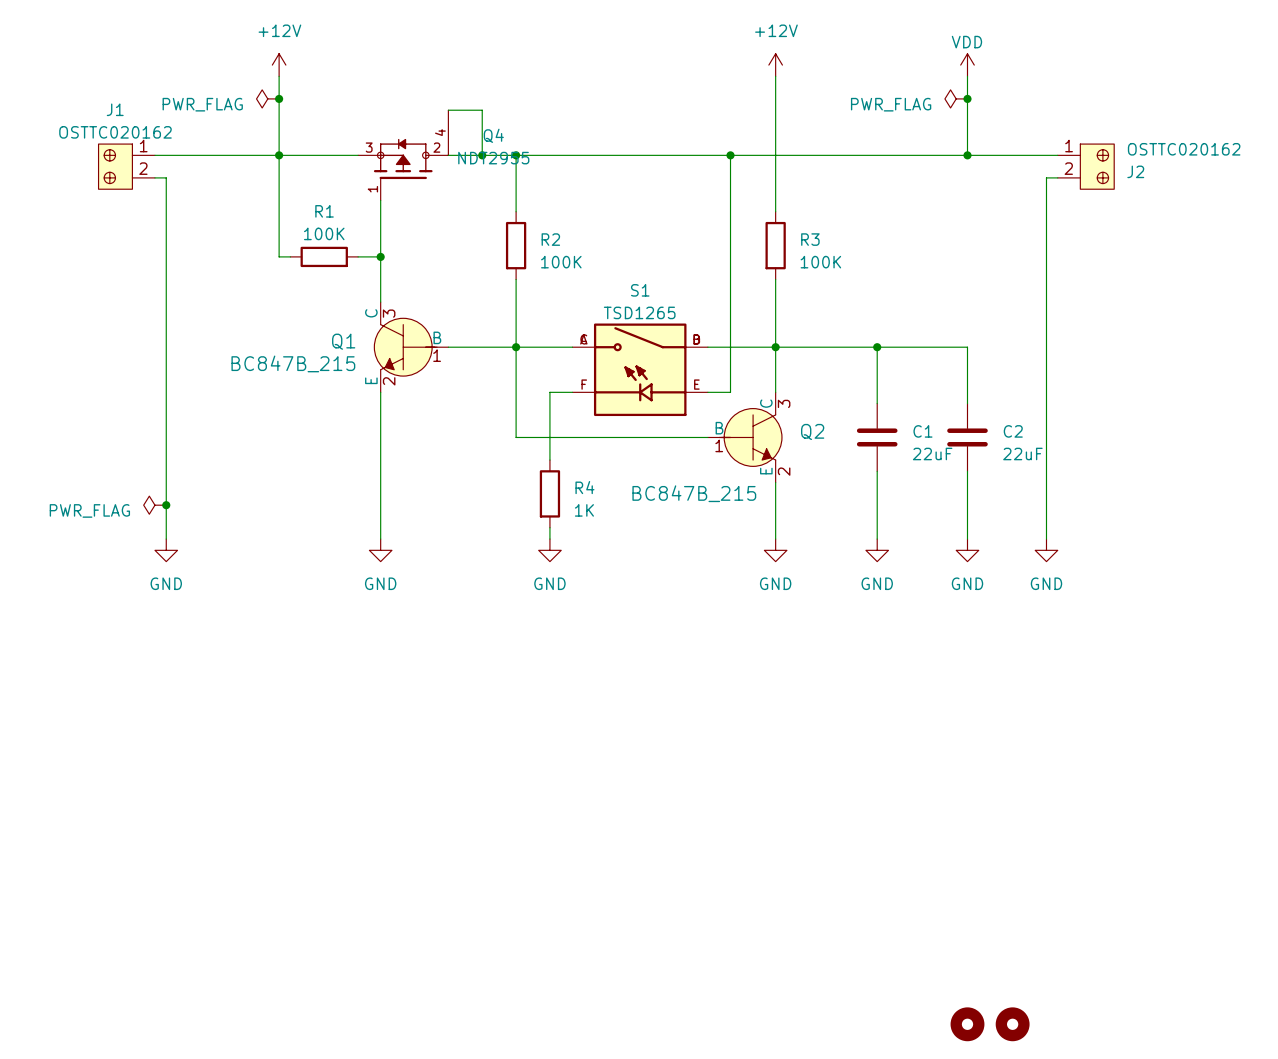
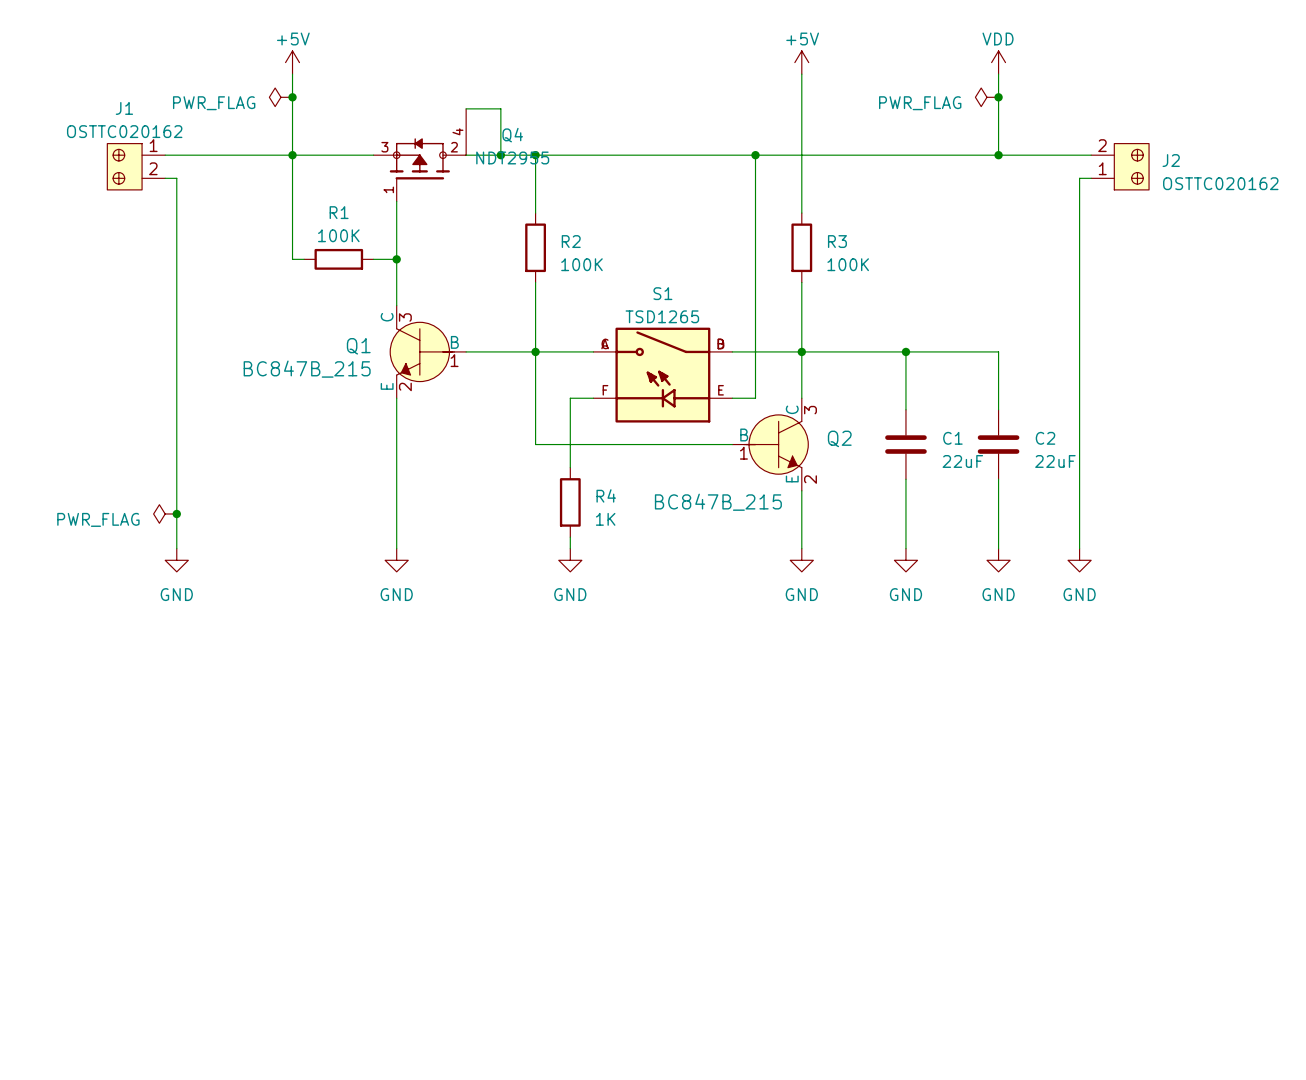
power symbol: +12V (279, 65) -> +5V (292, 62)
power symbol: +12V (775, 65) -> +5V (801, 62)
J2 flip: as is (1097, 166) -> up-down (1131, 166)
part: (967, 1024) -> none
part: (1012, 1024) -> none

